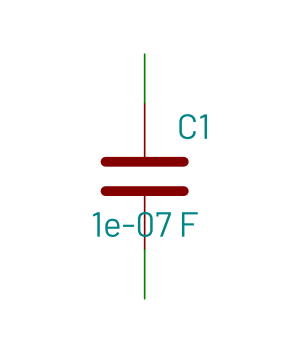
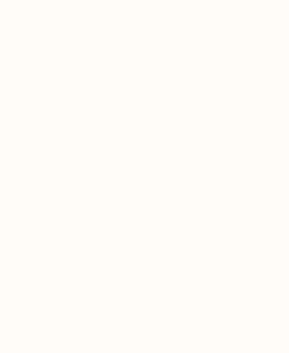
wire: (144, 54) (144, 103) -> none
C1: 1e-07 F (144, 176) -> none
wire: (144, 249) (144, 298) -> none

